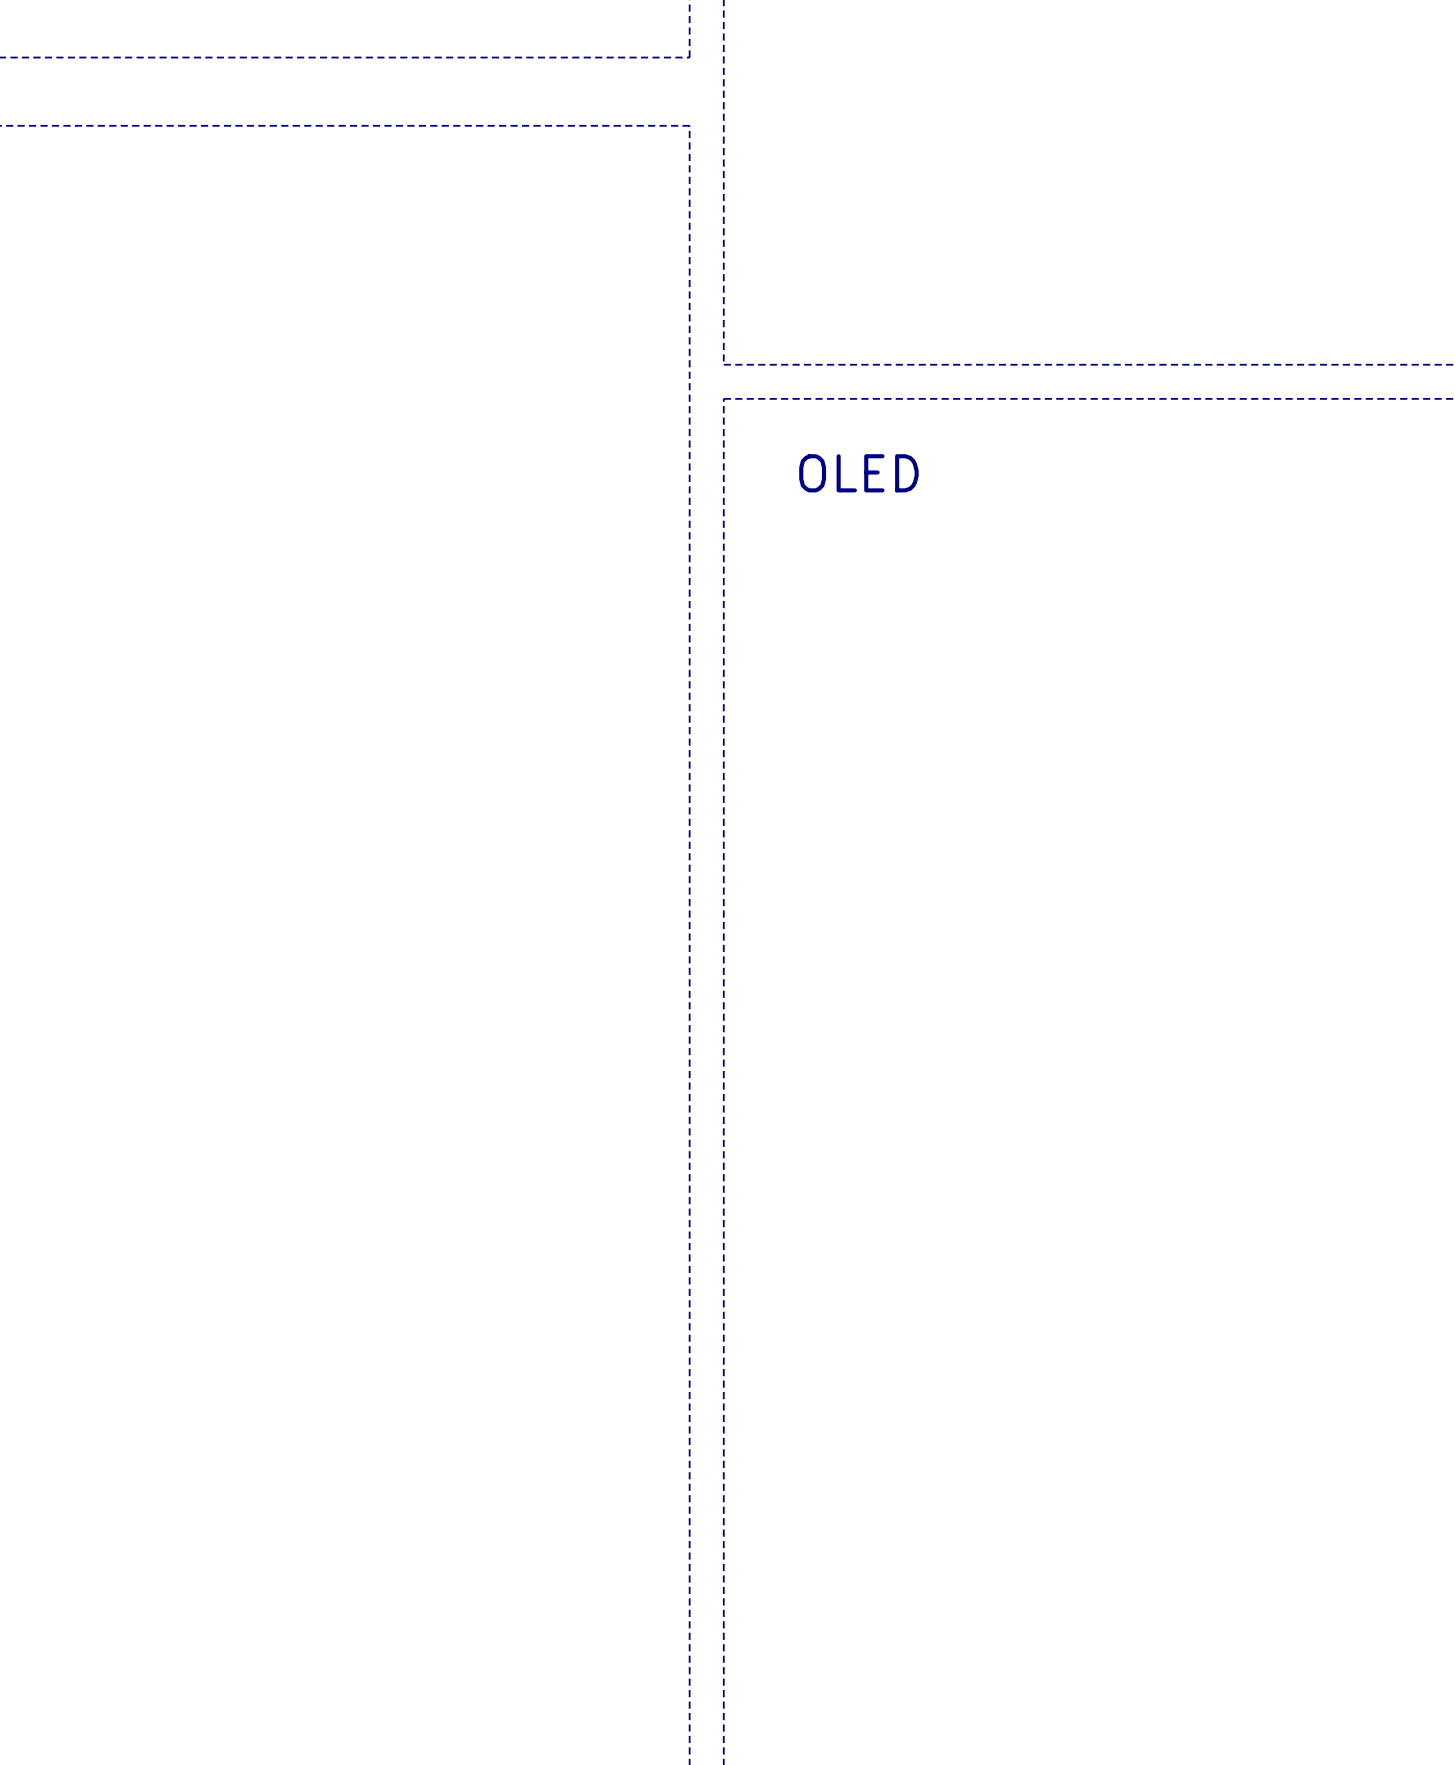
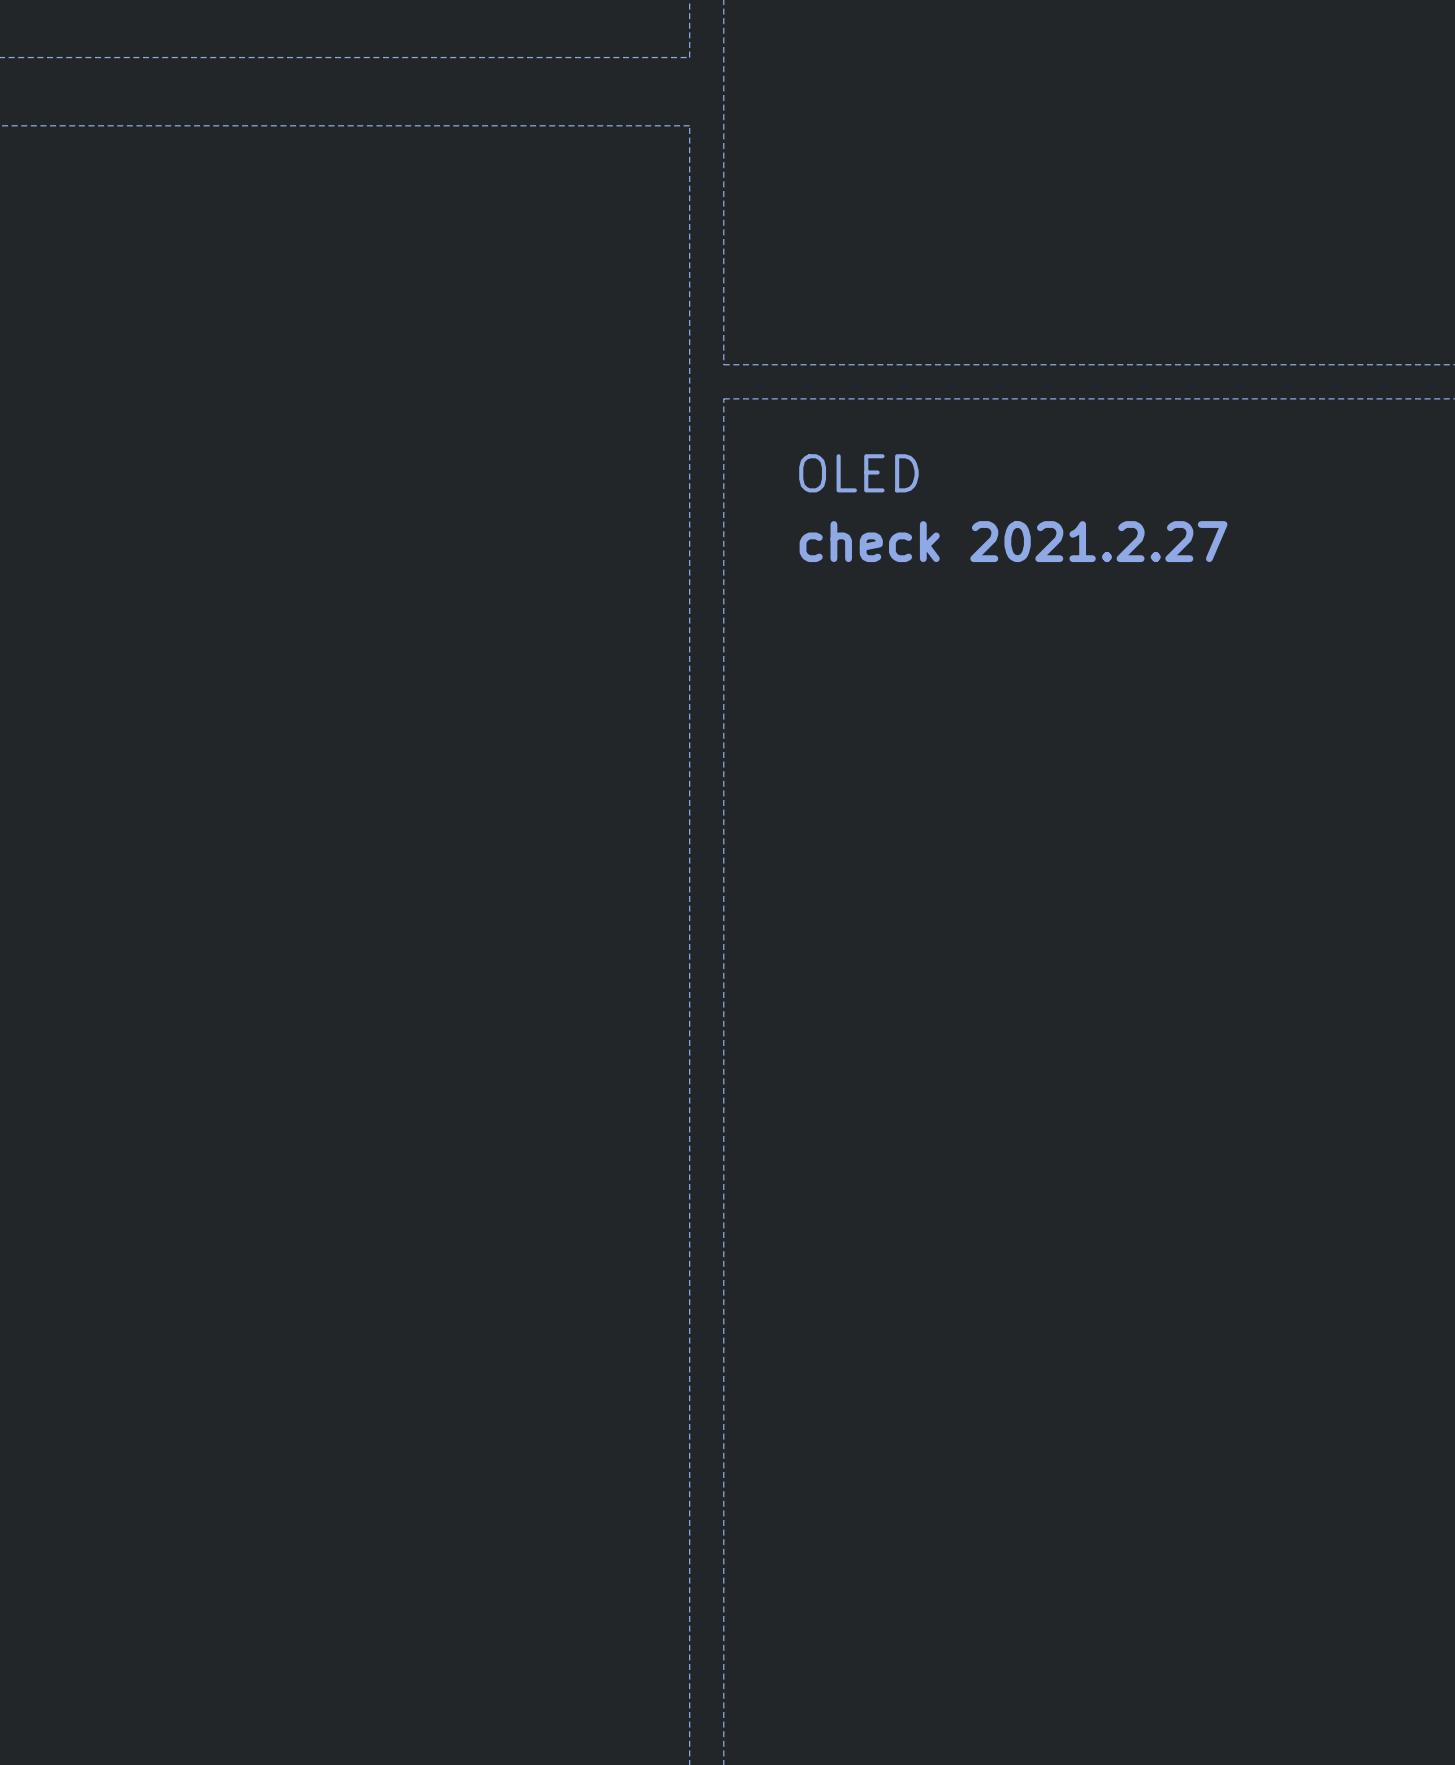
text: none -> check 2021.2.27 (1013, 541)

